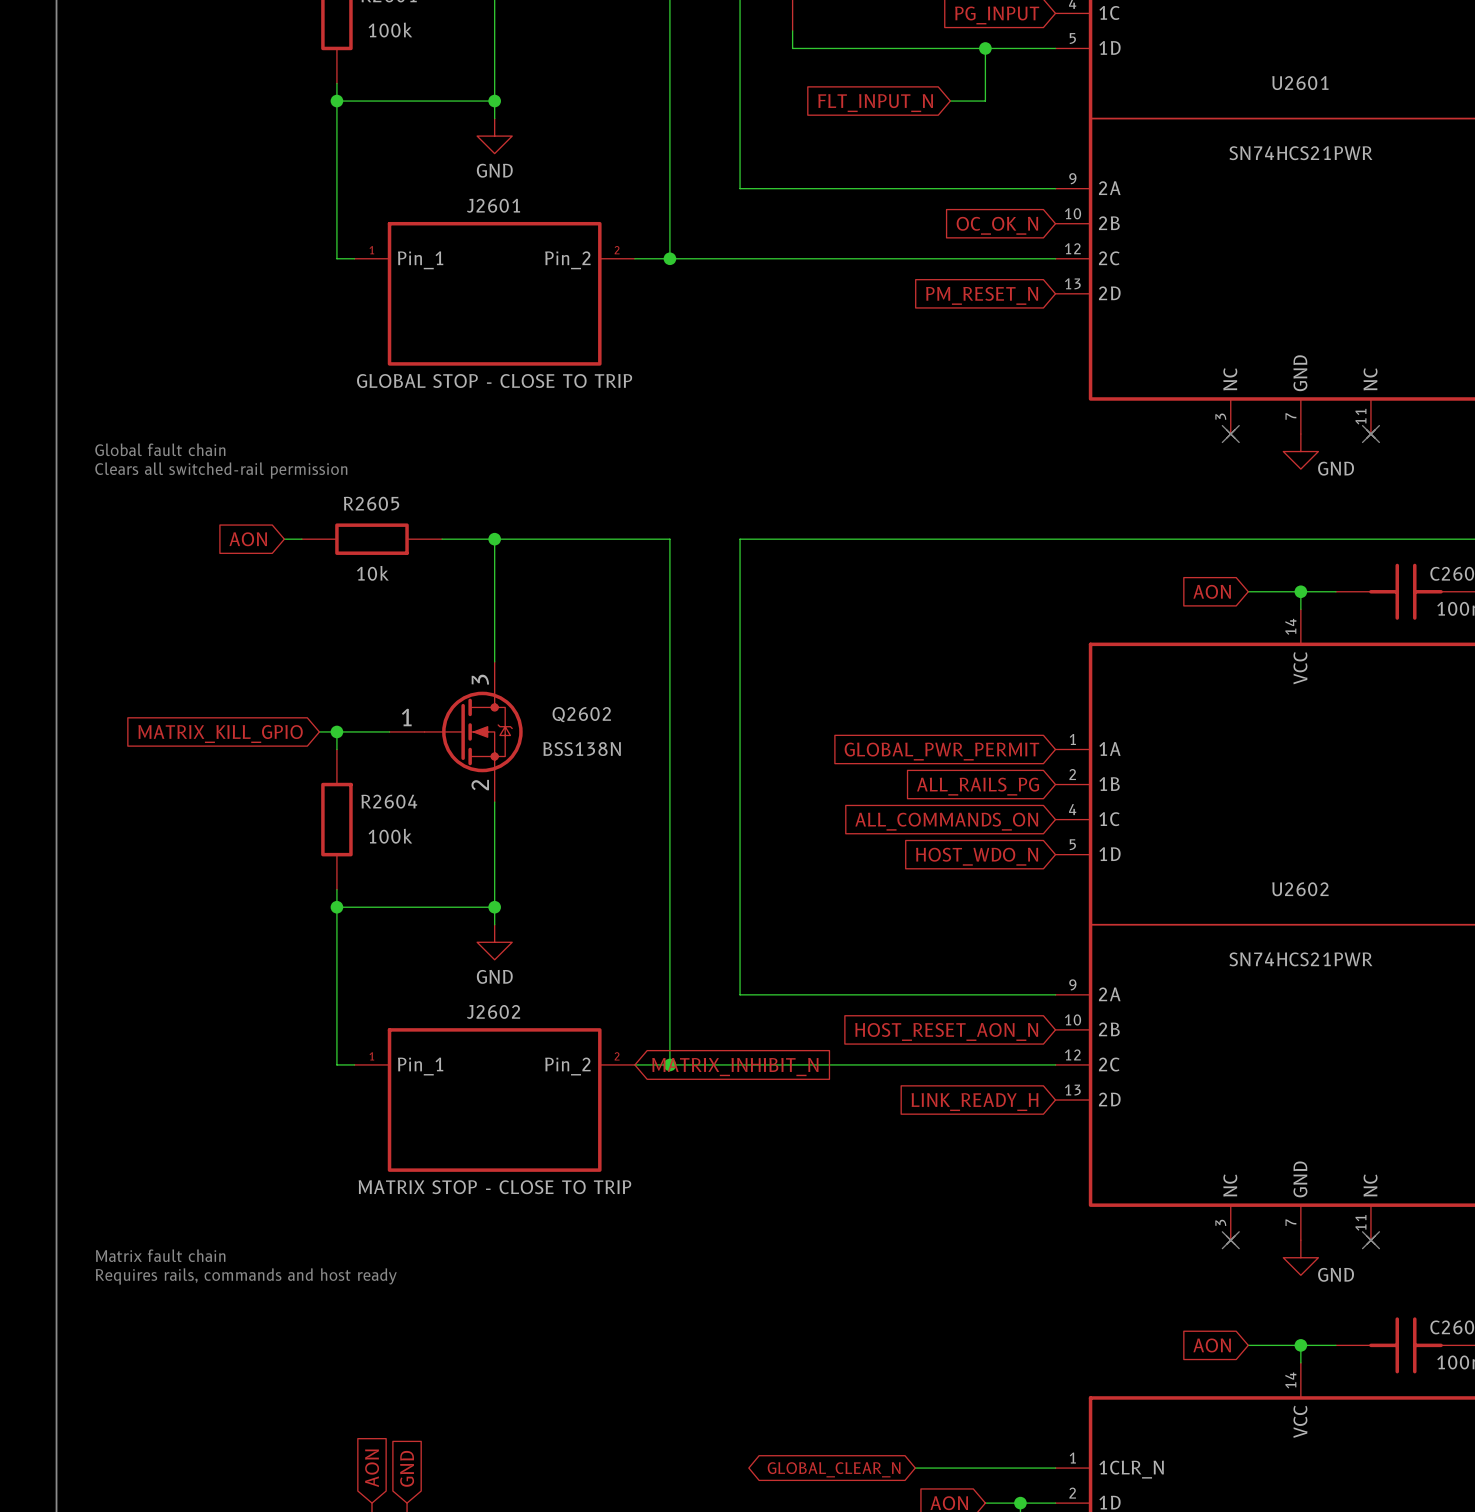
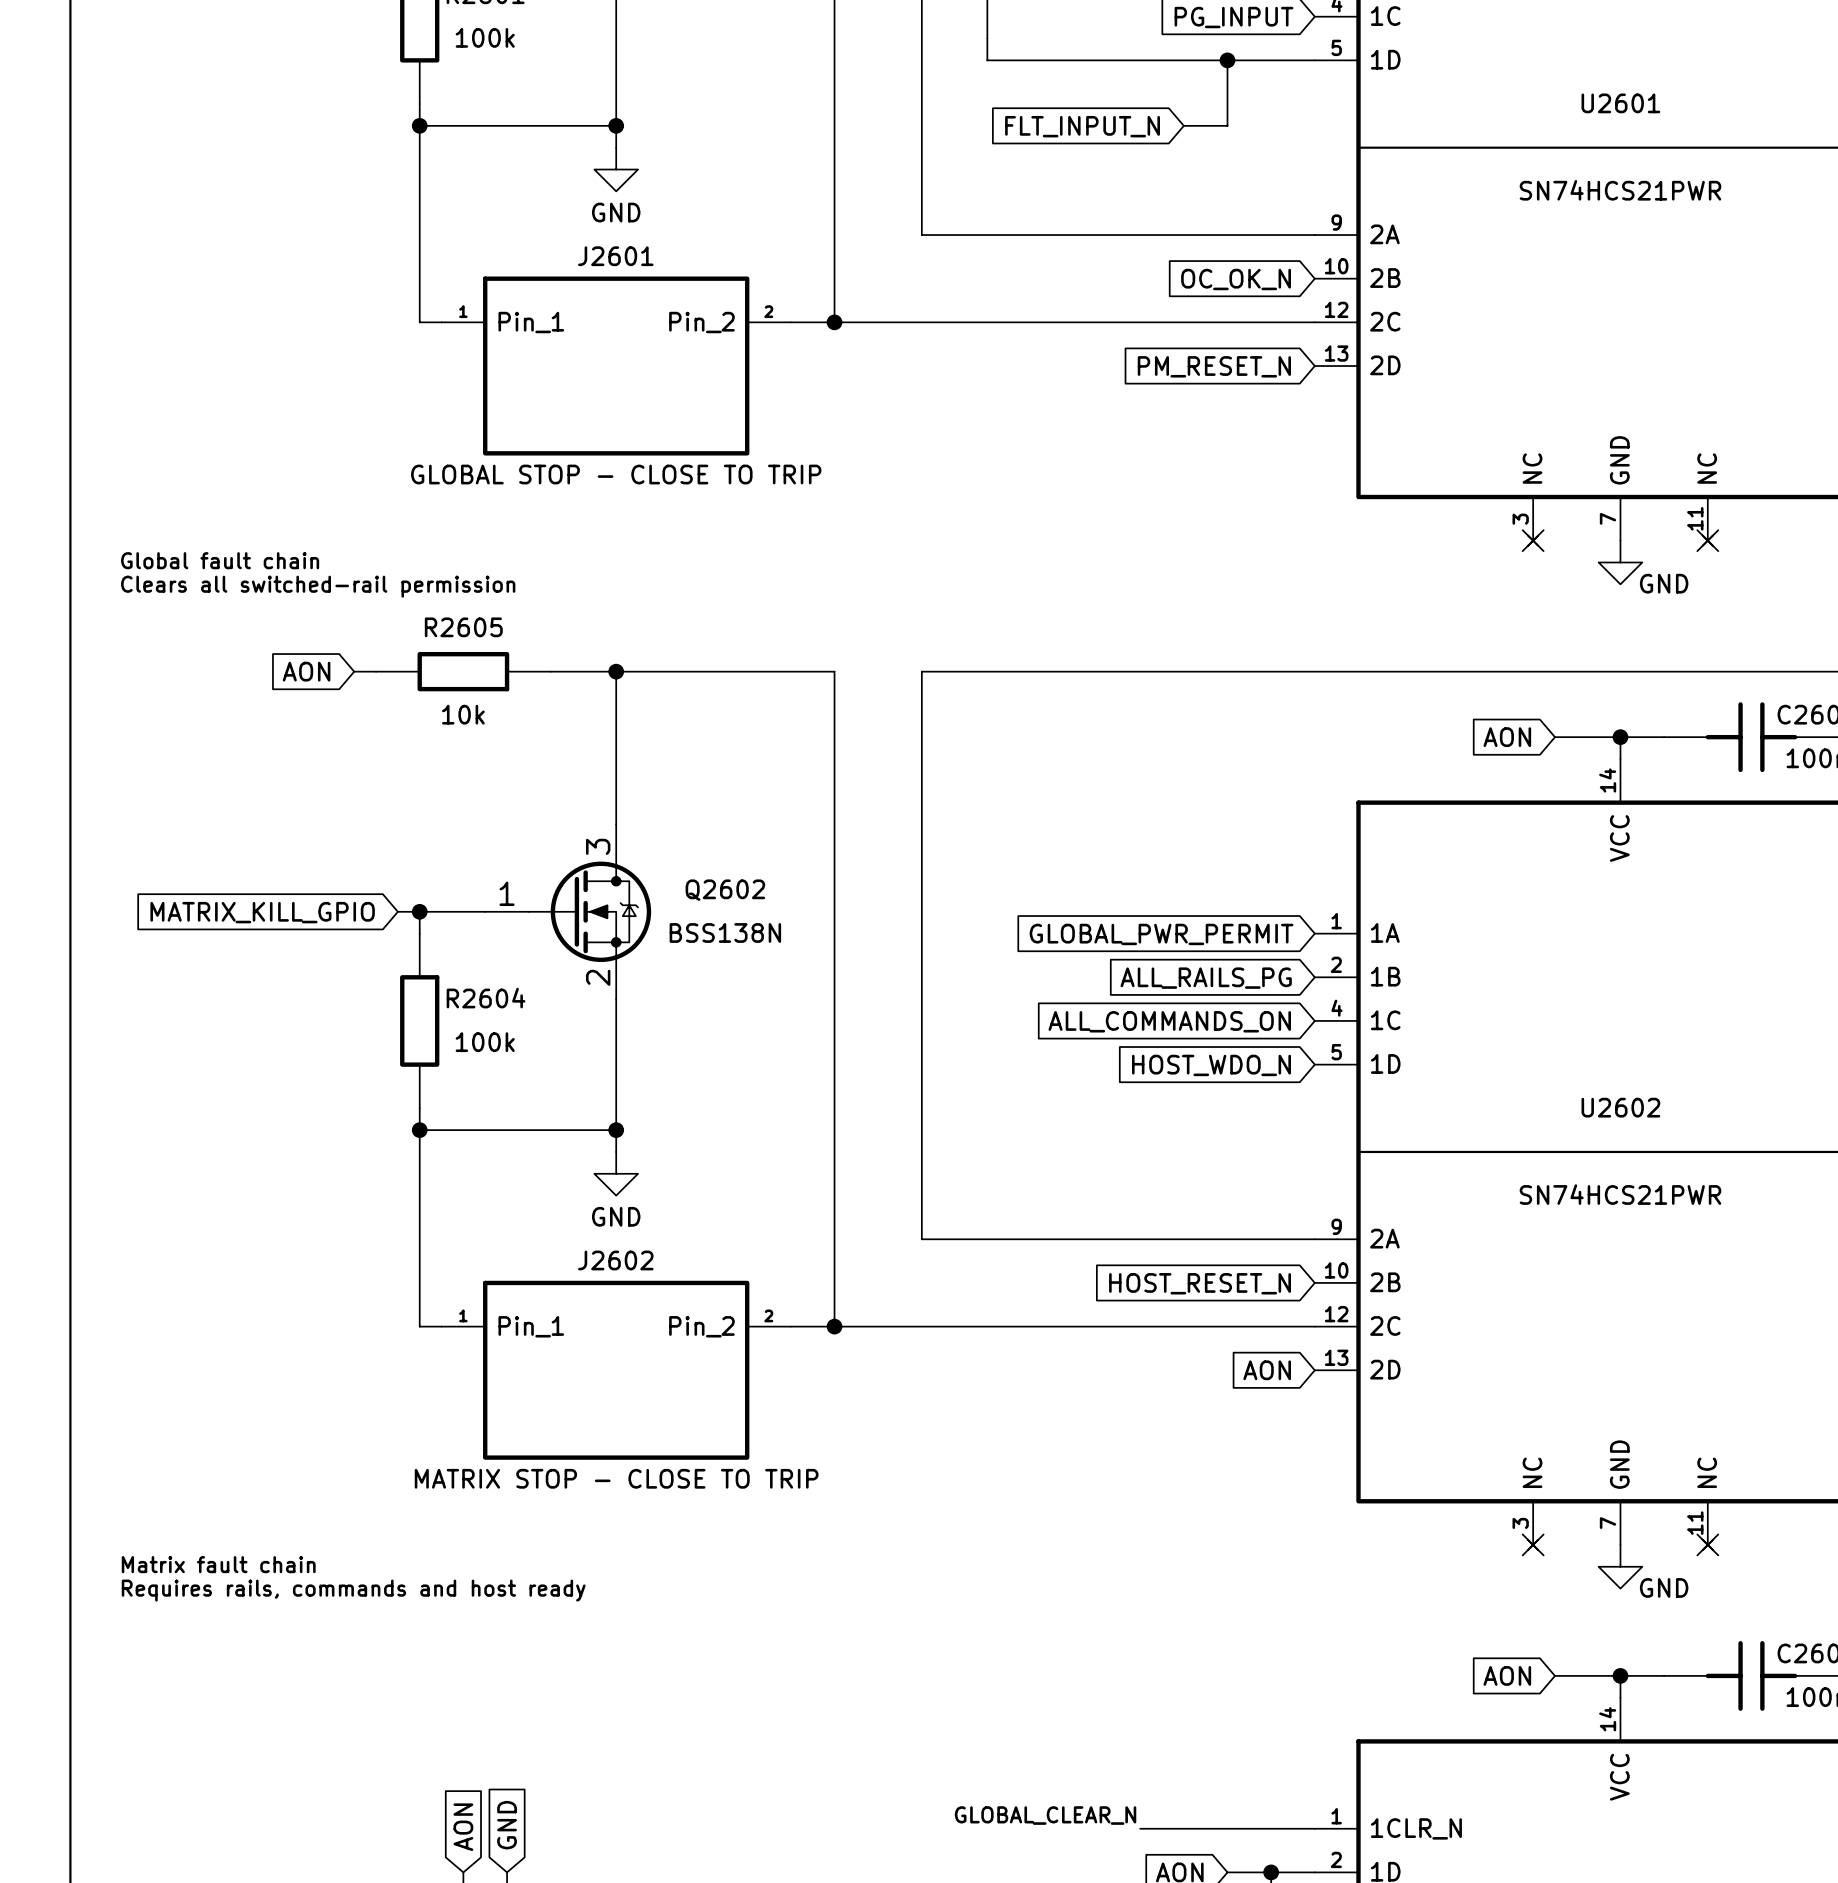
global label: HOST_RESET_AON_N (946, 1031) -> HOST_RESET_N (1200, 1283)
global label: MATRIX_INHIBIT_N (735, 1067) -> none
global label: LINK_READY_H (974, 1102) -> AON (1267, 1370)
label: none -> GLOBAL_CLEAR_N (1045, 1815)
global label: GLOBAL_CLEAR_N (834, 1469) -> none

